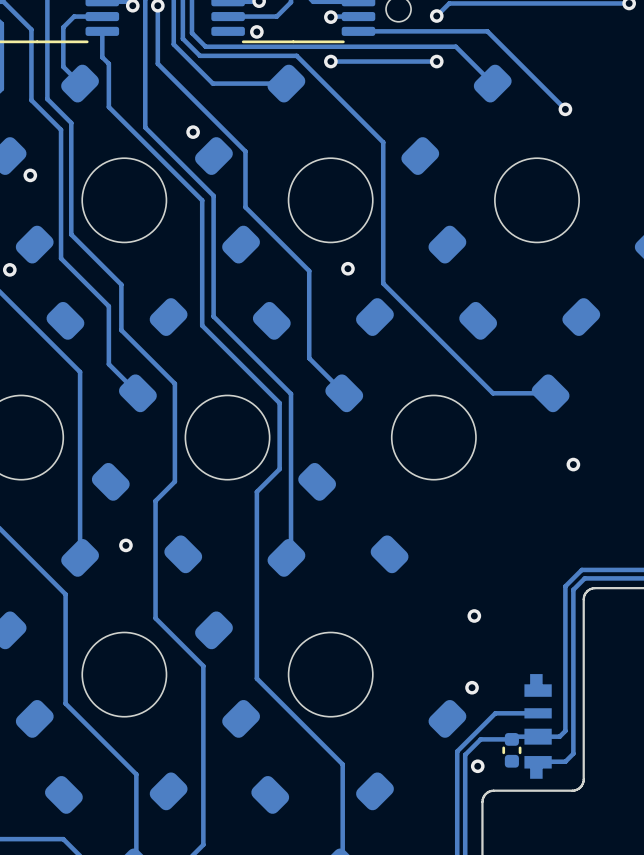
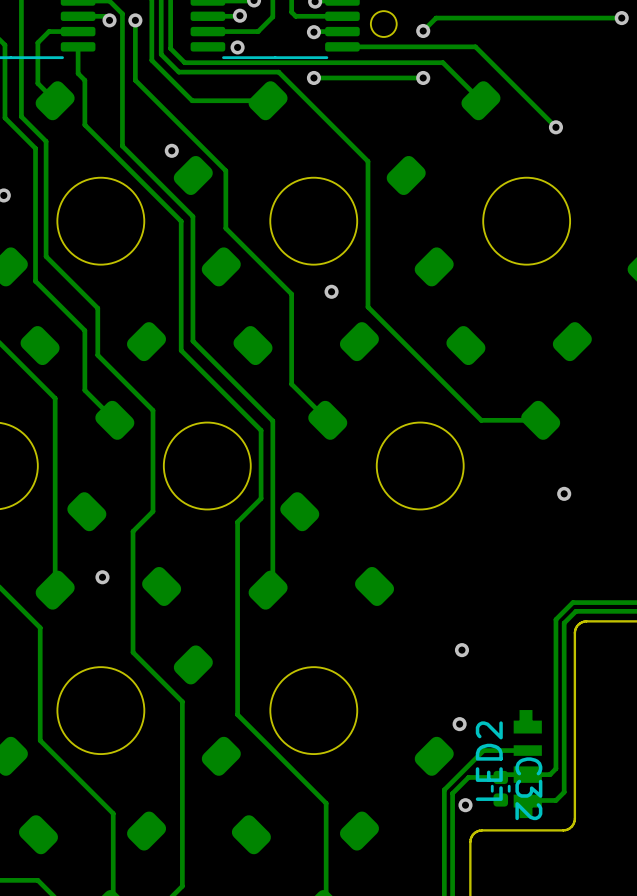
LED2 name: none -> LED2 (489, 761)
C32 name: none -> C32 (528, 788)

